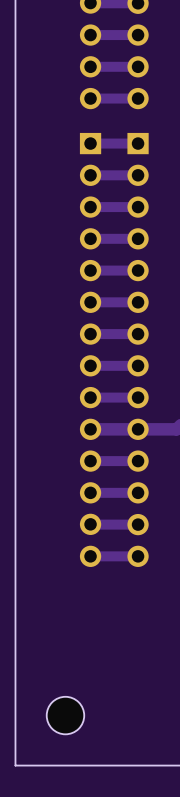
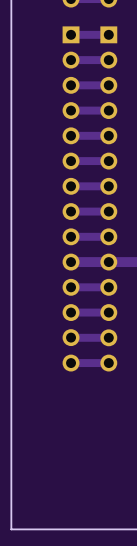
part: (65, 715) -> none

